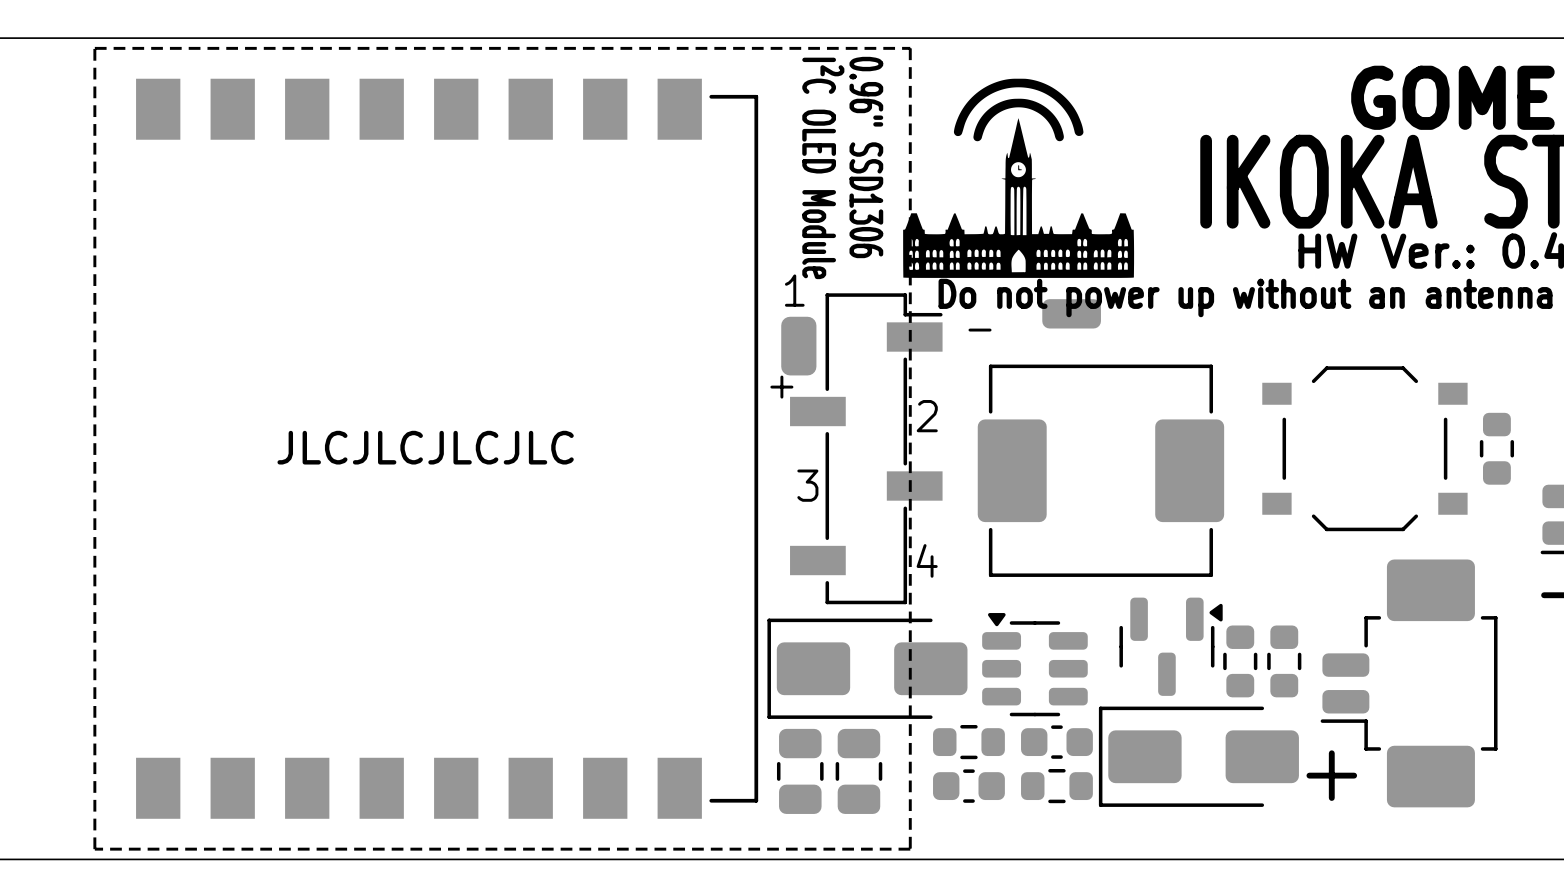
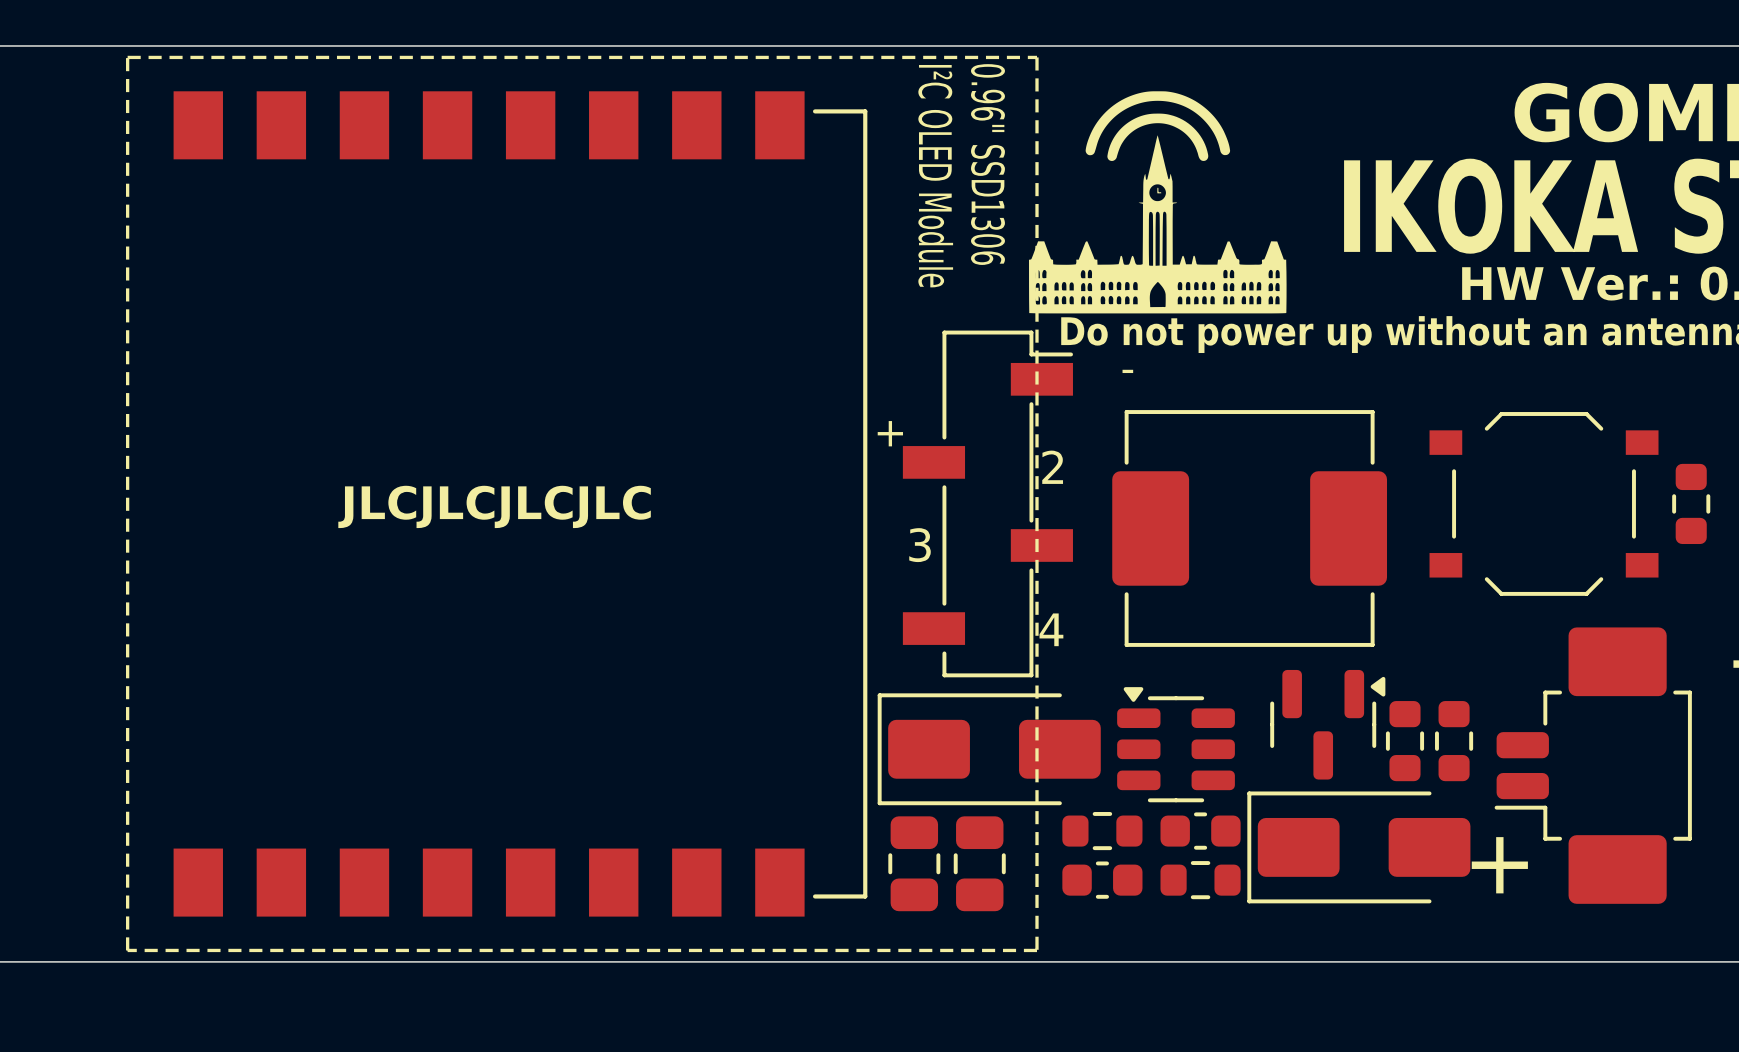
text: 1 (794, 290) -> none
part: (1071, 313) -> none
part: (798, 346) -> none

